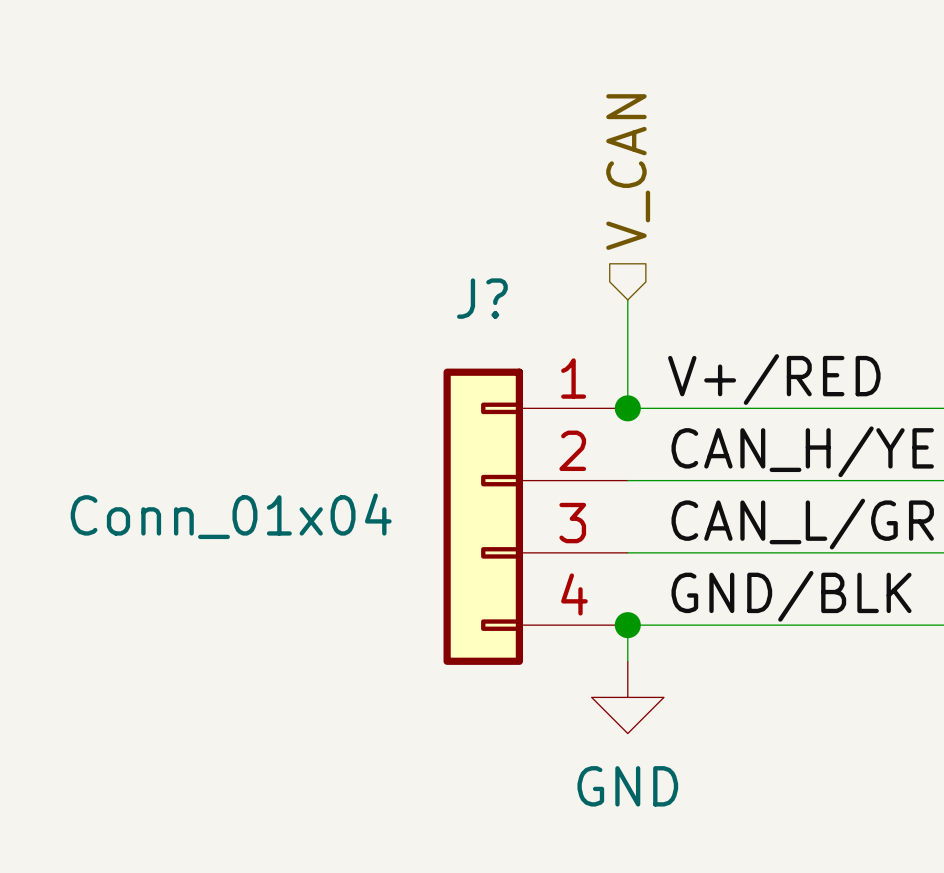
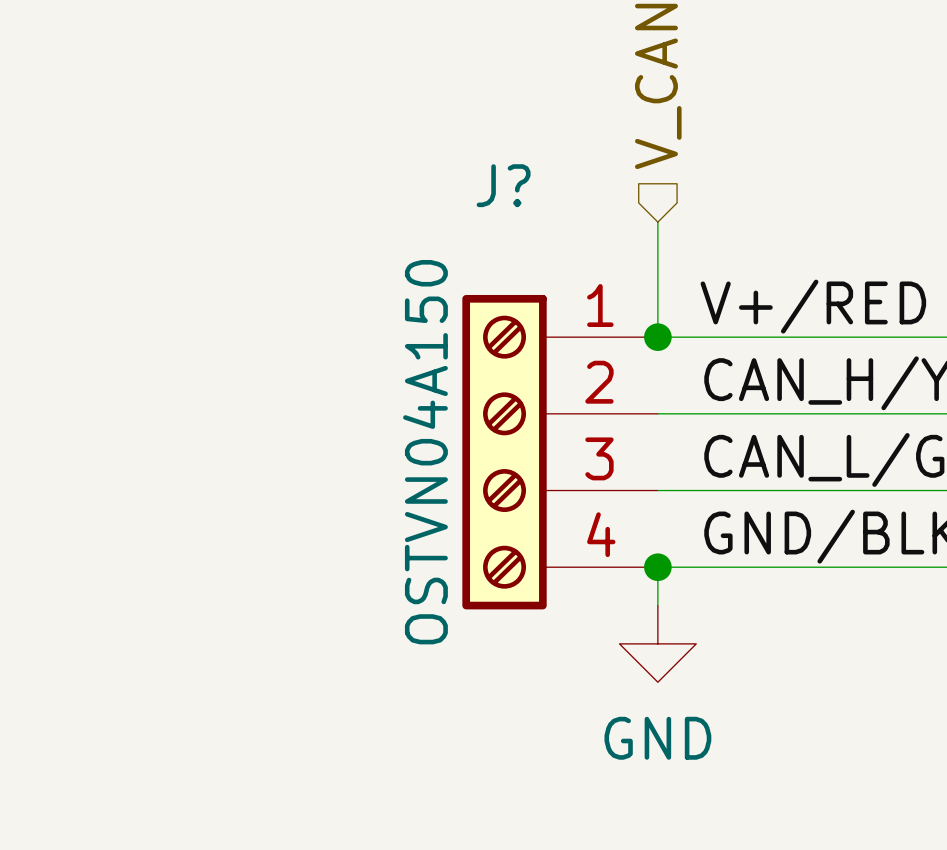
J? name position: J? (482, 298) -> J? (503, 185)
J? symbol: [443, 368, 628, 665] -> [462, 294, 658, 610]
J? value: Conn_01x04 (231, 516) -> OSTVN04A150 (425, 452)

